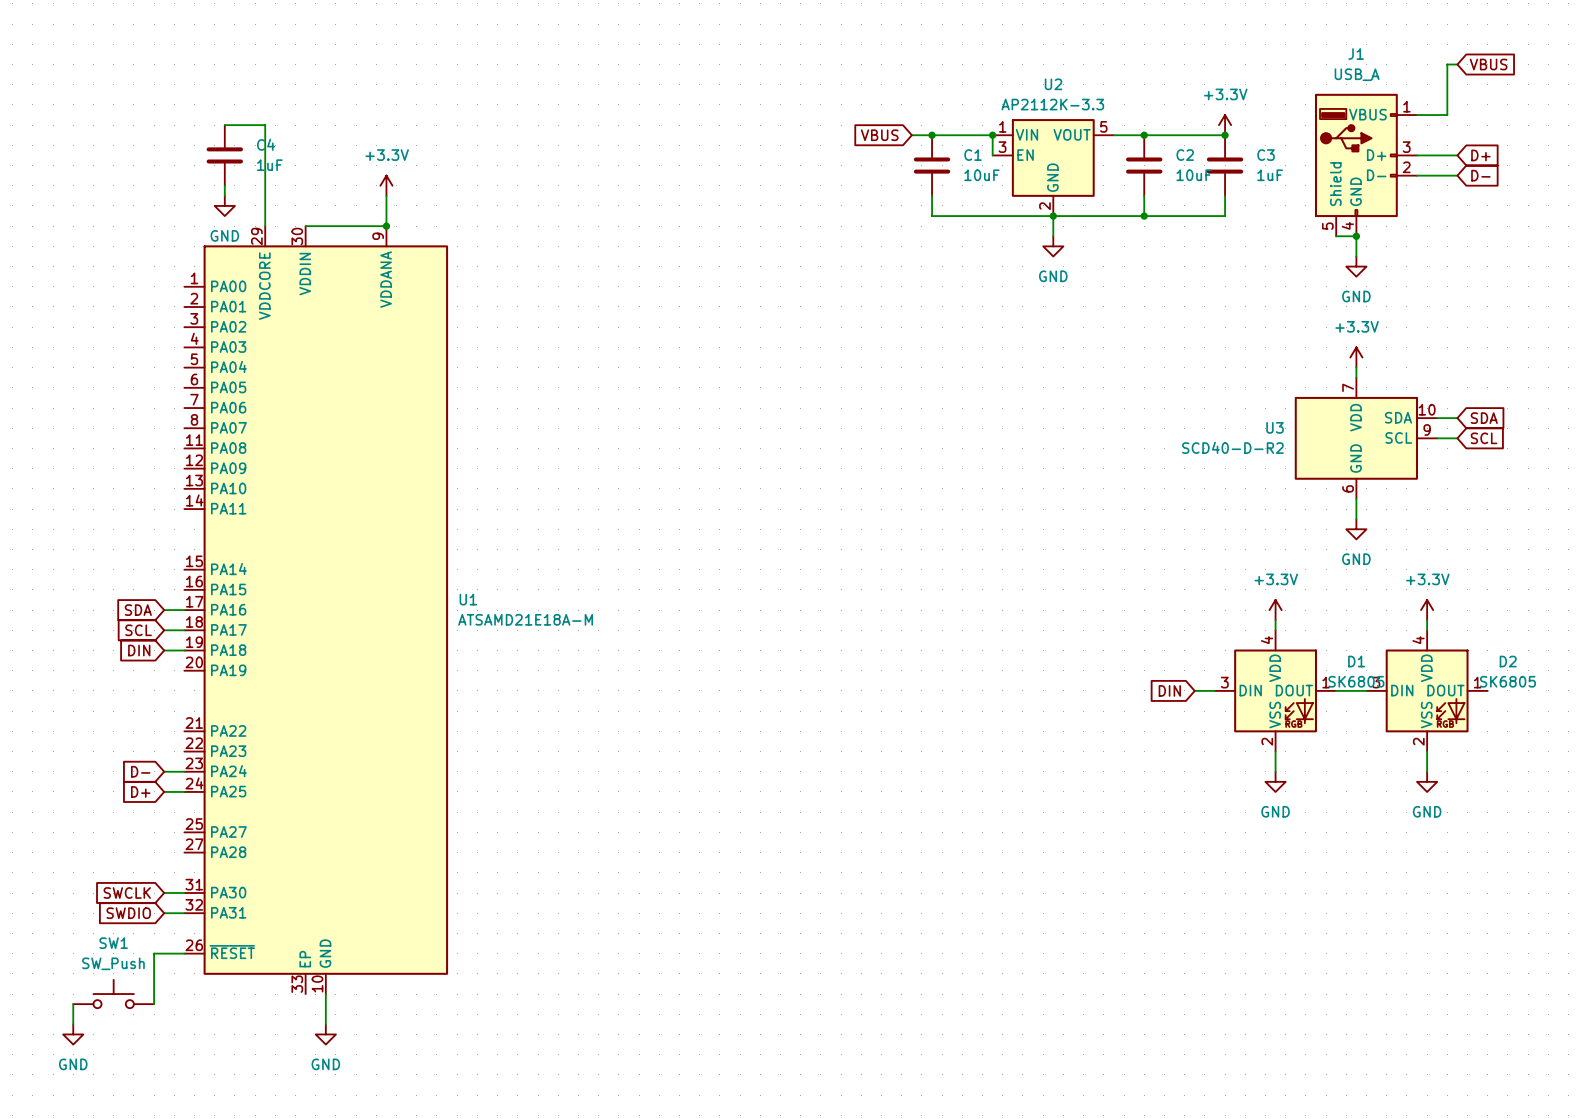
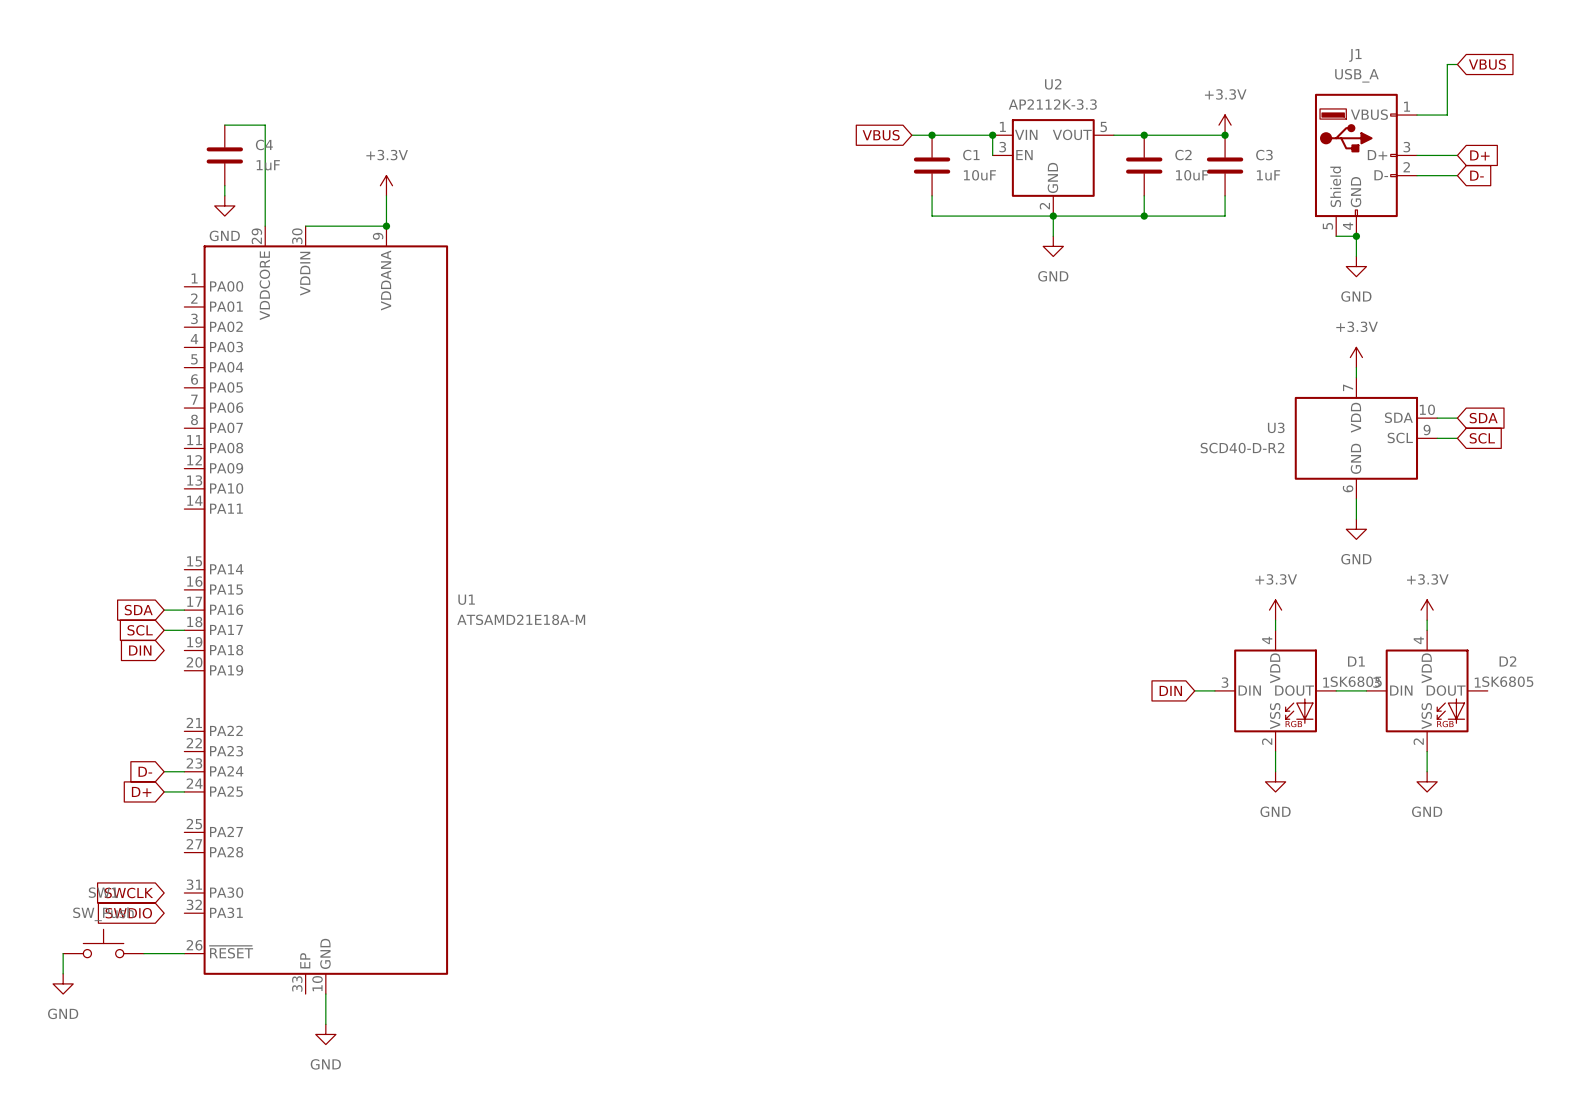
wire: (164, 650) (184, 650) -> none
wire: (164, 893) (184, 893) -> none
wire: (164, 913) (184, 913) -> none
wire: (154, 953) (154, 1004) -> (154, 953) (143, 953)
SW1 position: (113, 994) -> (103, 943)
wire: (73, 1004) (73, 1024) -> (63, 953) (63, 973)
power symbol position: GND (73, 1034) -> GND (63, 983)

